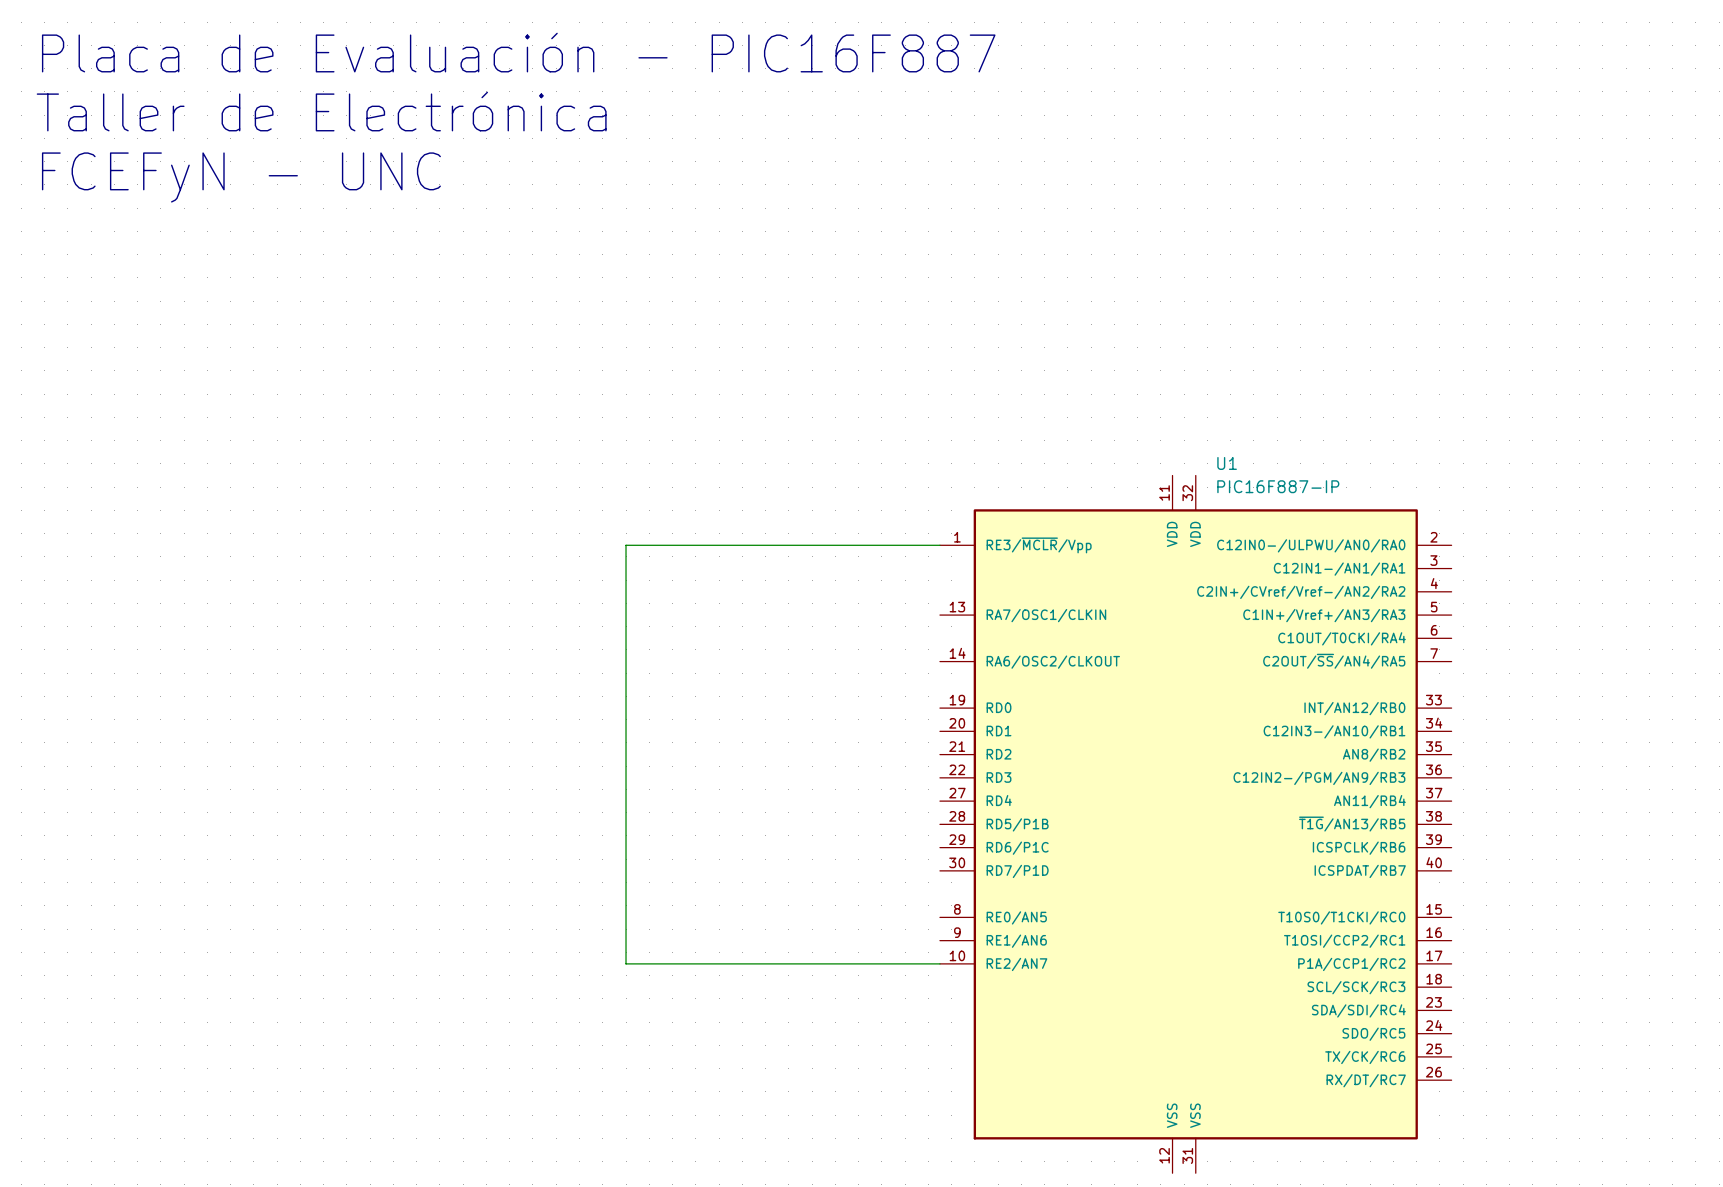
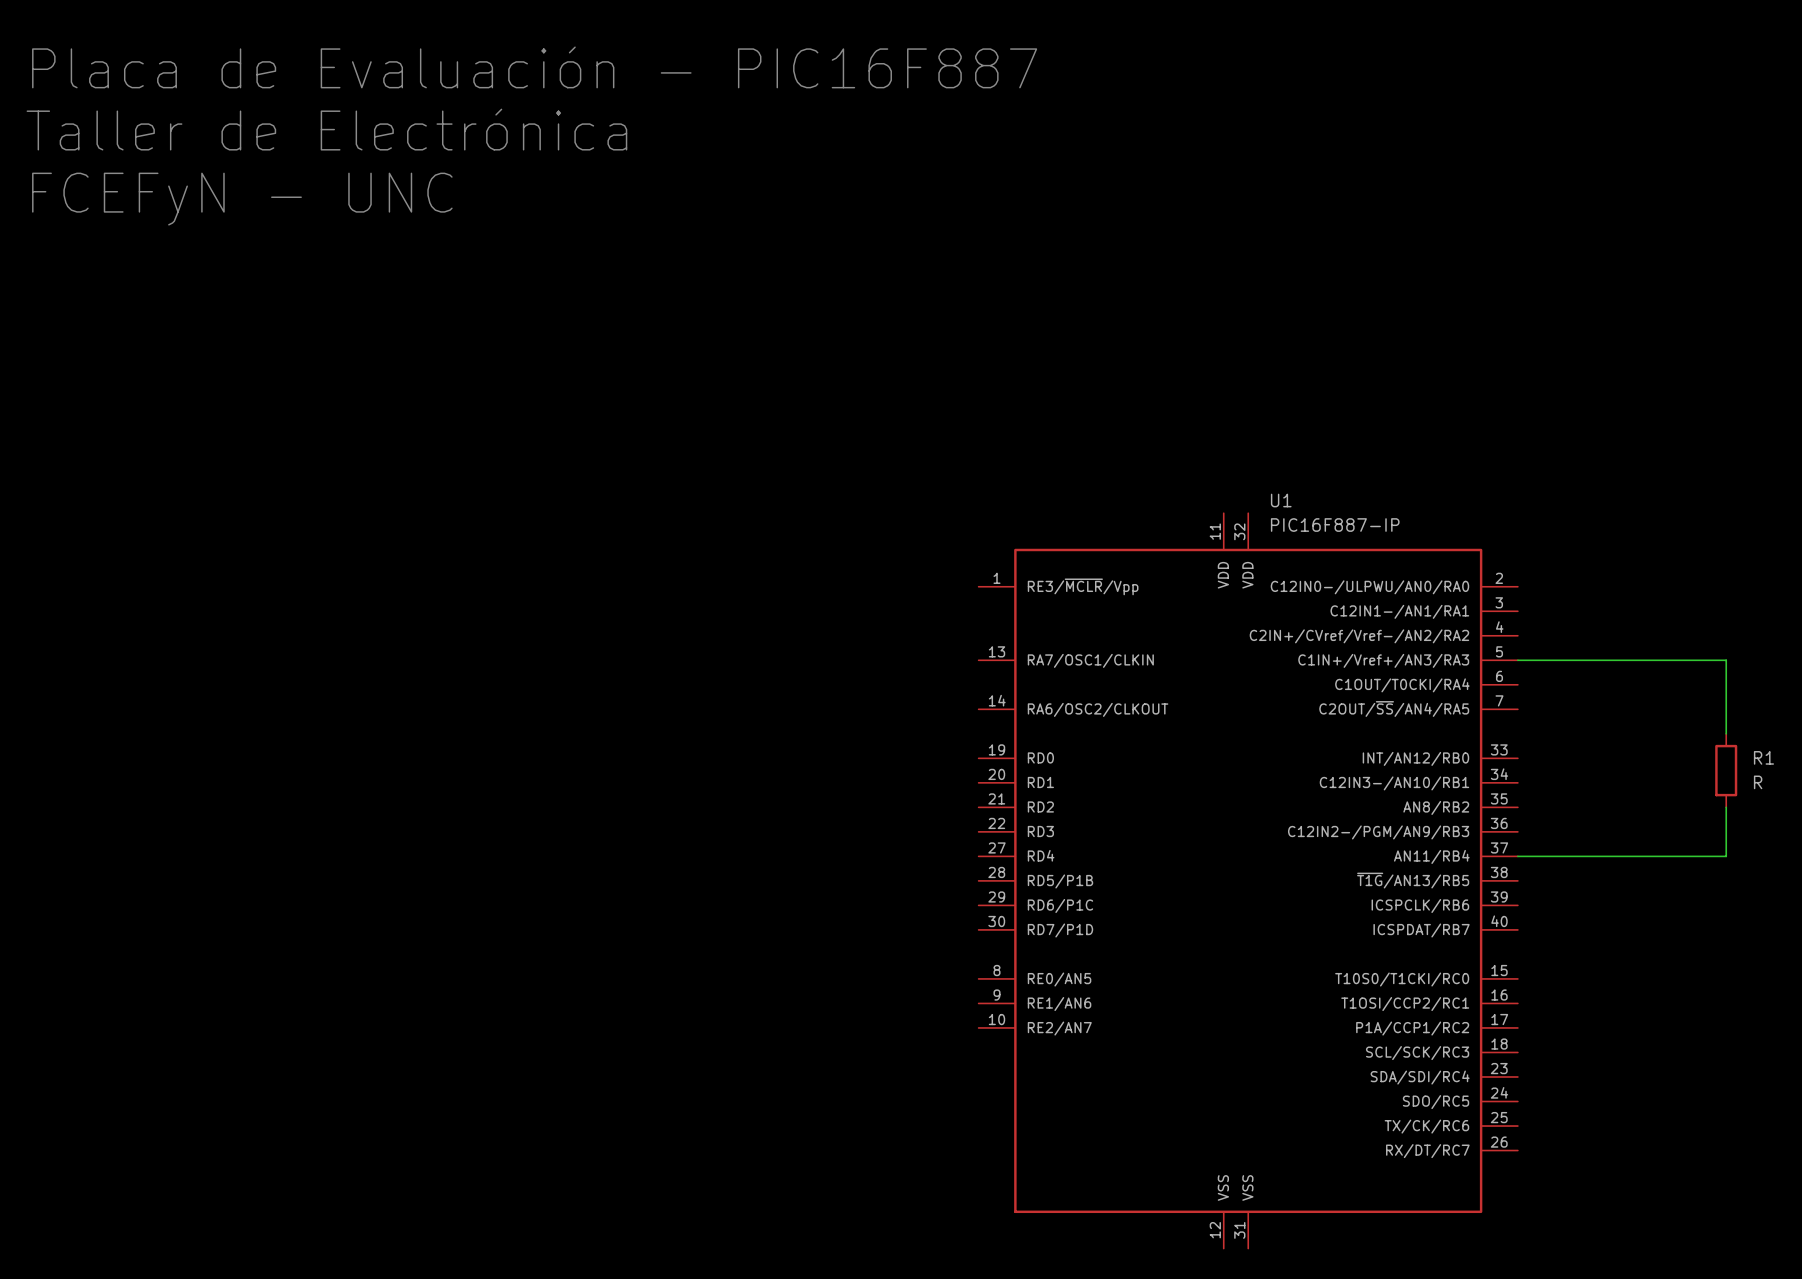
wire: (939, 545) (626, 545) (626, 963) (939, 963) -> none
wire: none -> (1517, 660) (1726, 660) (1726, 733)
R1: none -> R (1726, 770)
wire: none -> (1726, 807) (1726, 856) (1517, 856)

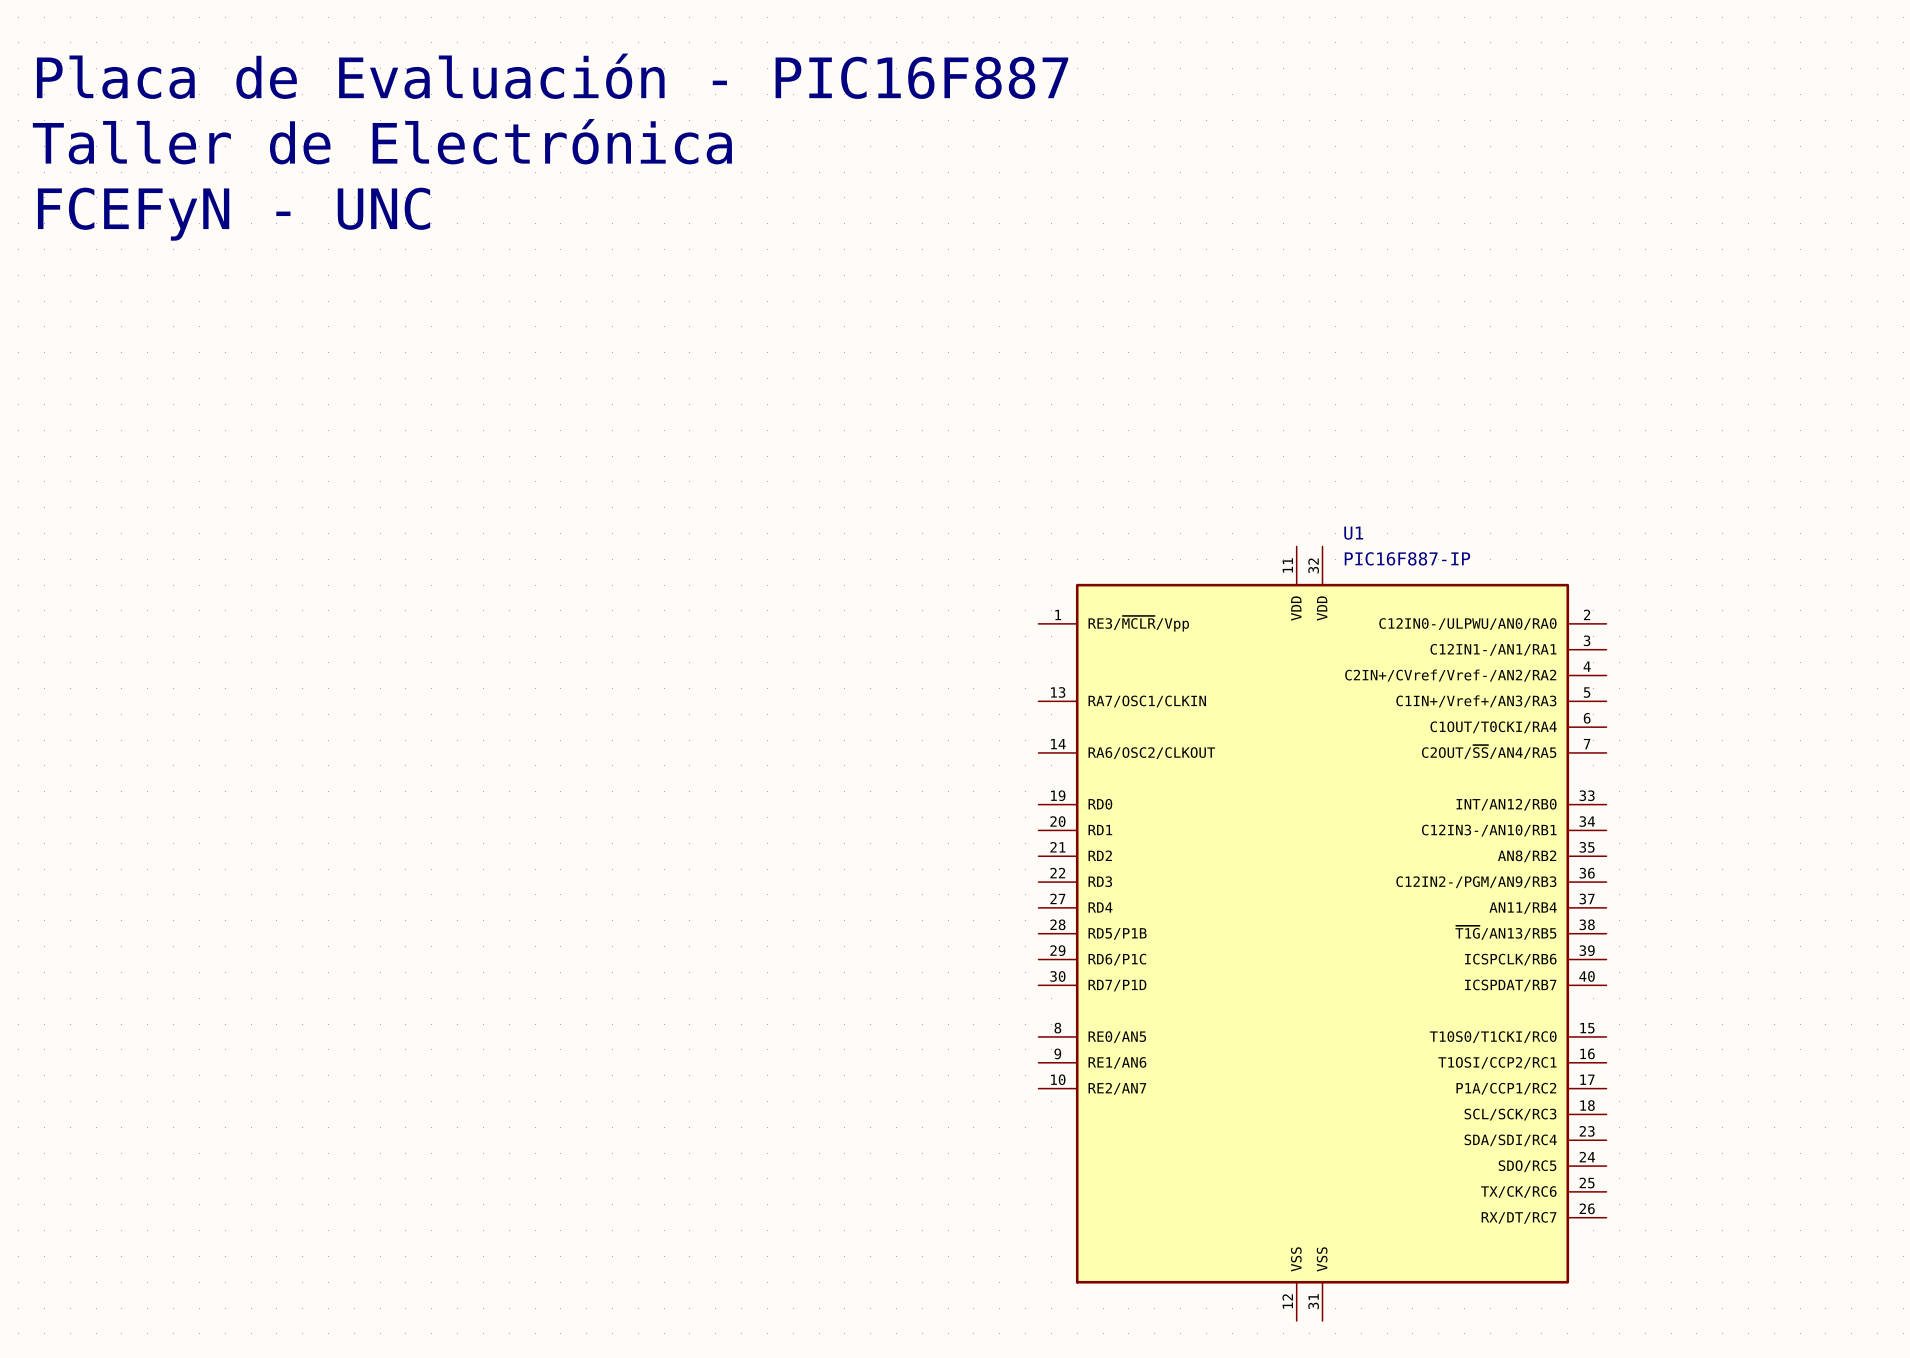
wire: (1517, 660) (1726, 660) (1726, 733) -> none
R1: R (1726, 770) -> none
wire: (1726, 807) (1726, 856) (1517, 856) -> none

